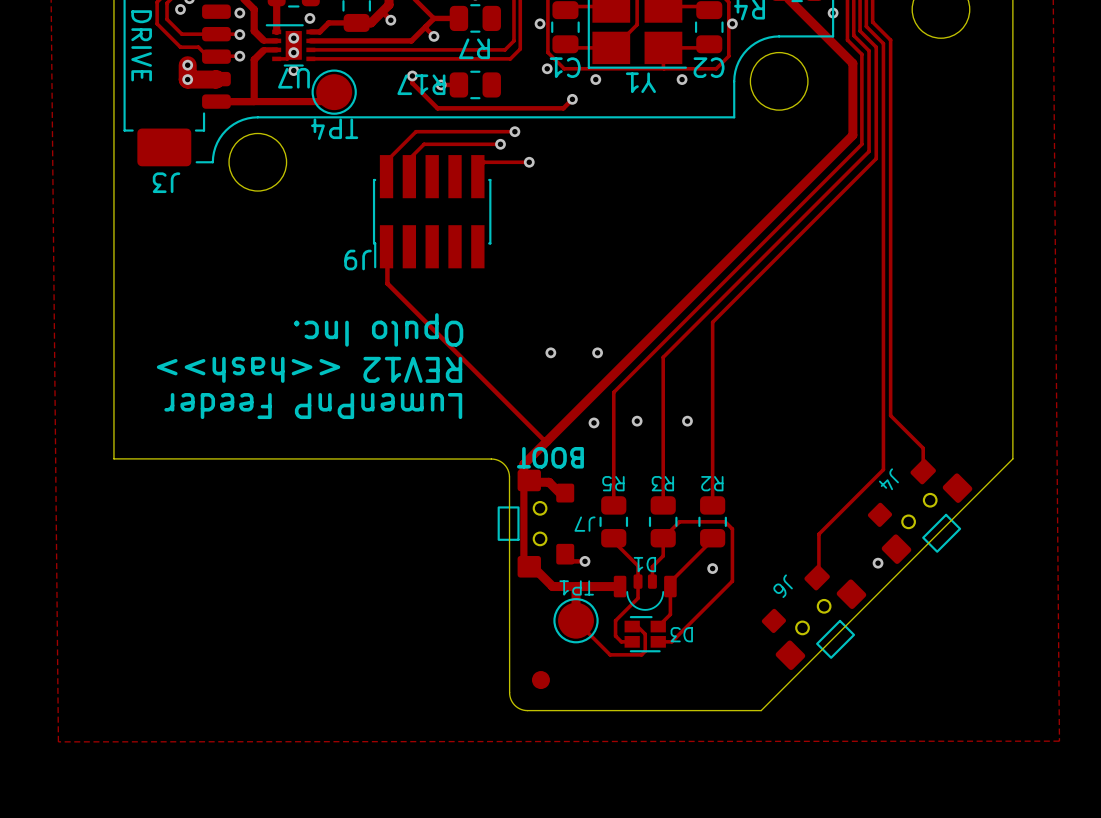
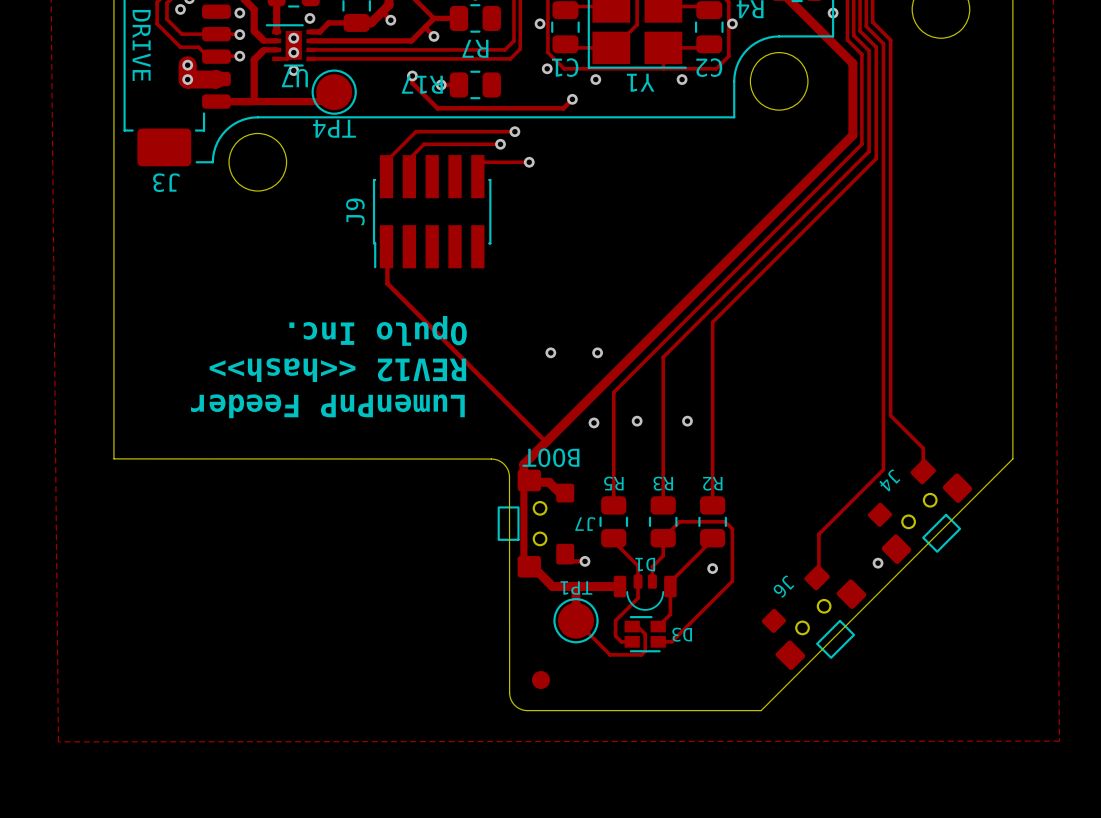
J9 name rotation: 0° (358, 260) -> 90° clockwise (355, 211)
J9 name position: J9 (358, 260) -> J9 (355, 211)

